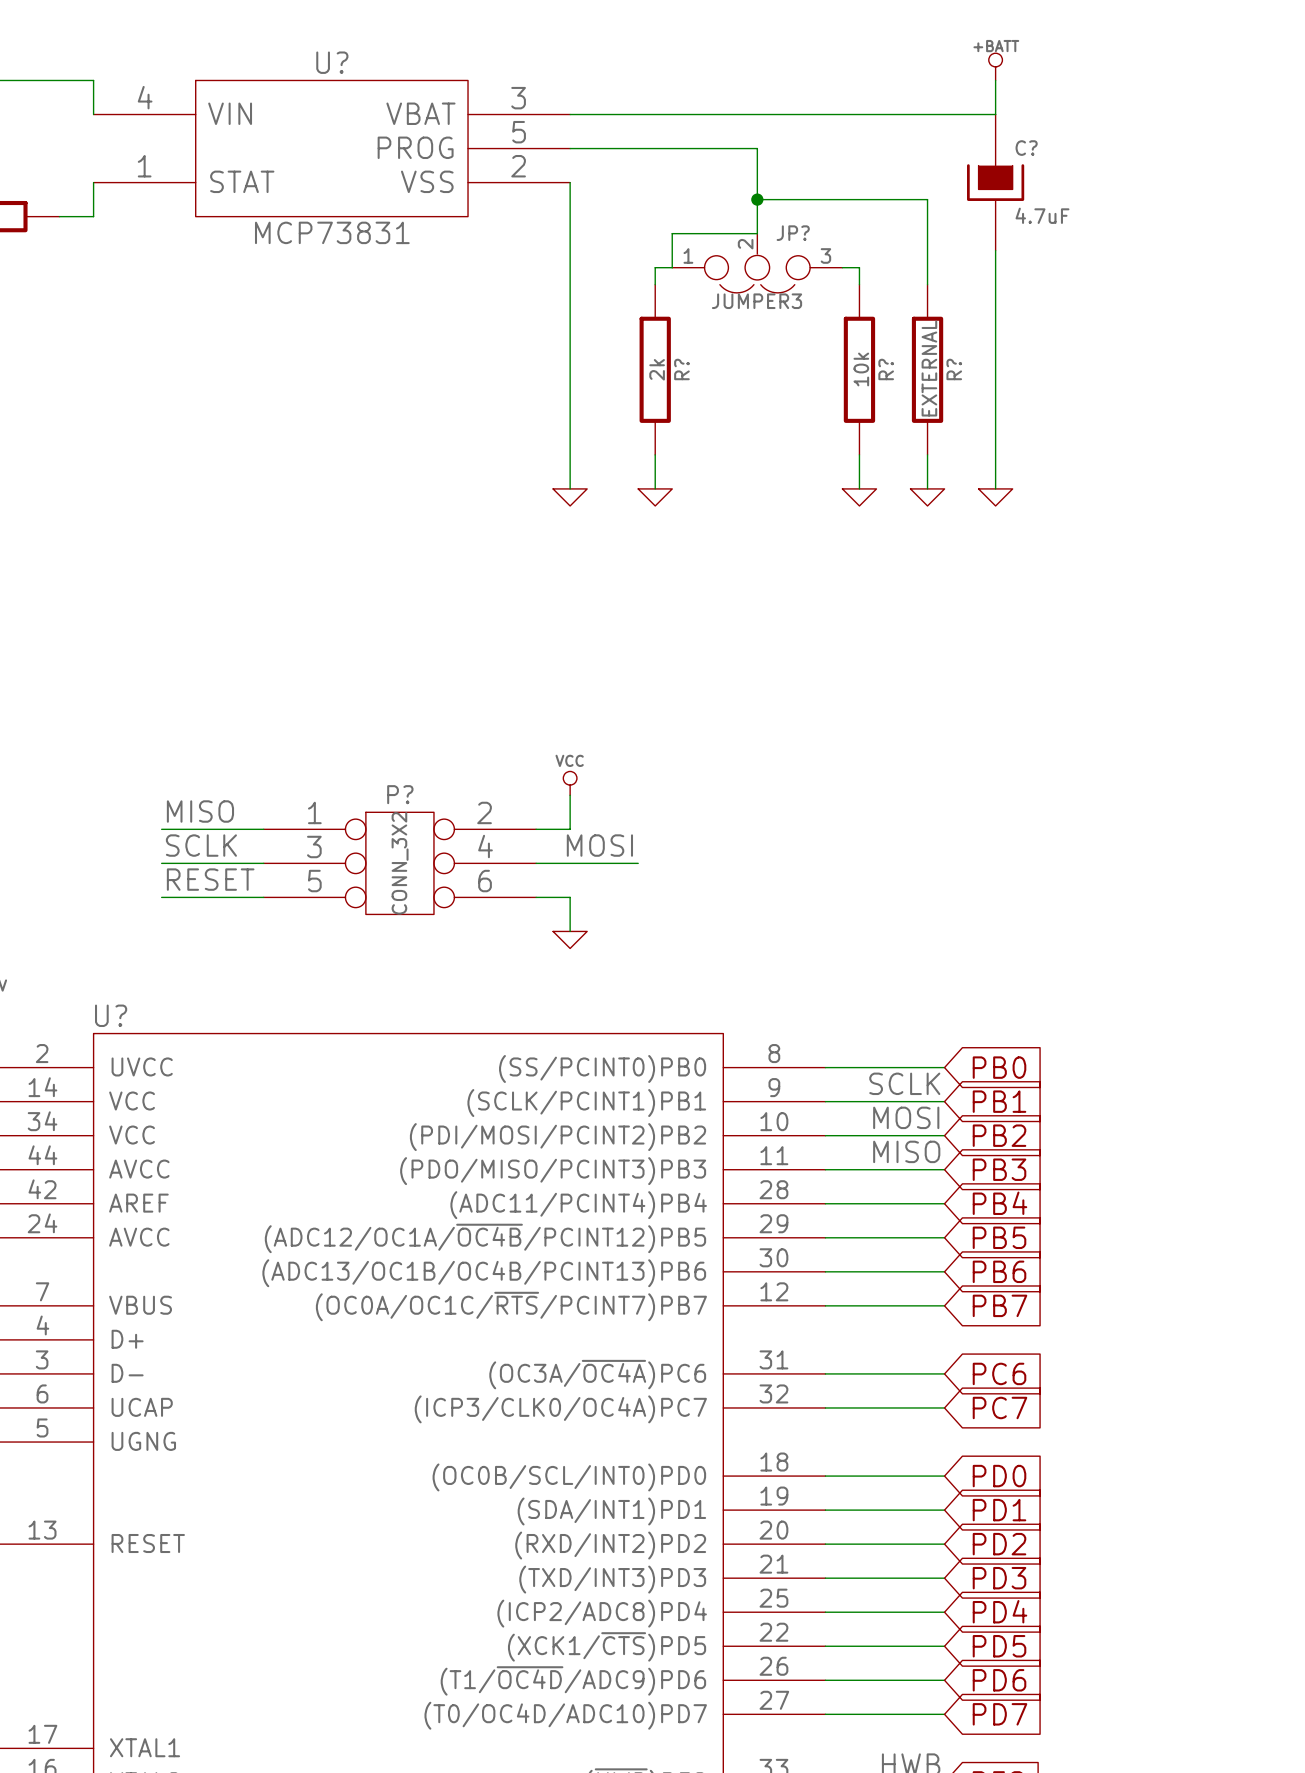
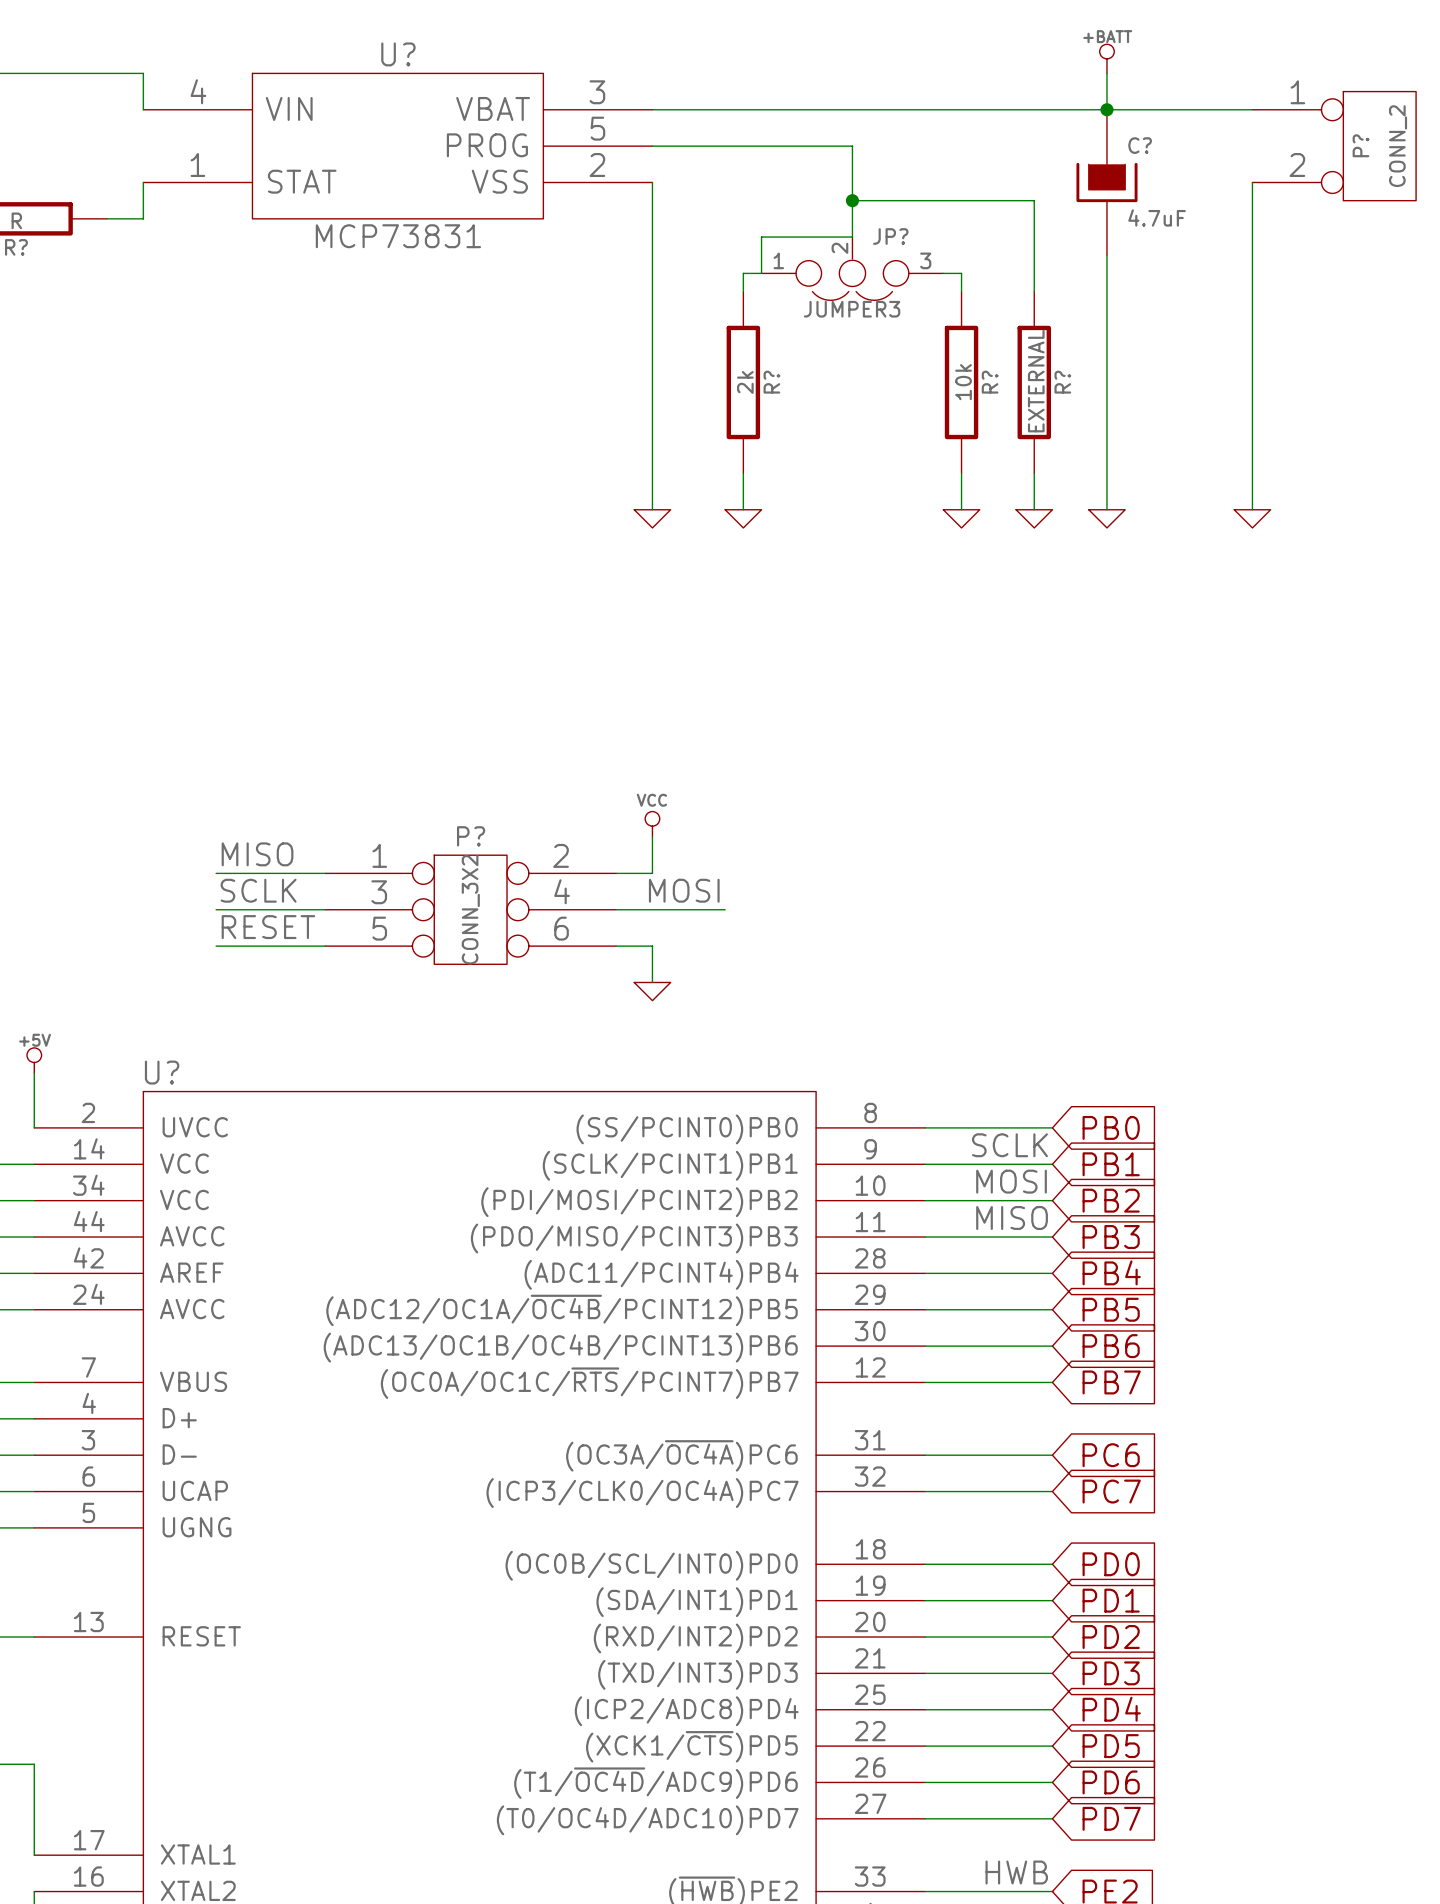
wire: none -> (1106, 109) (1252, 109)
junction: none -> (1106, 109)
P?: none -> CONN_2 (1334, 146)
wire: none -> (1252, 182) (1252, 509)
power symbol: none -> (1252, 518)

